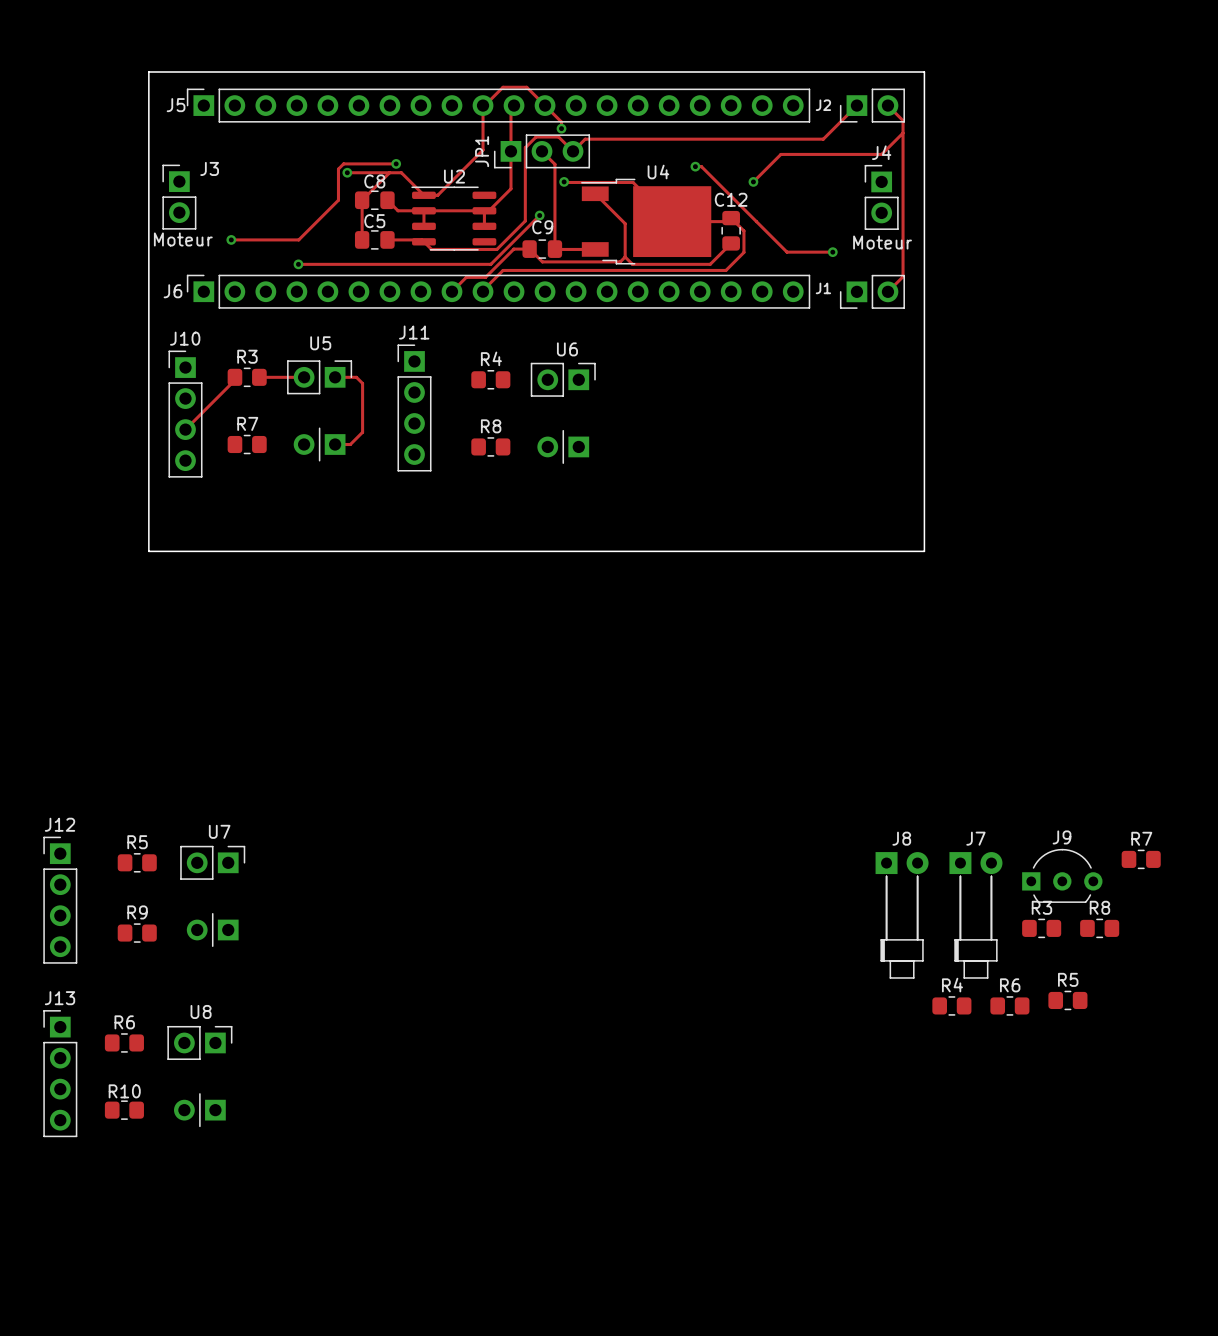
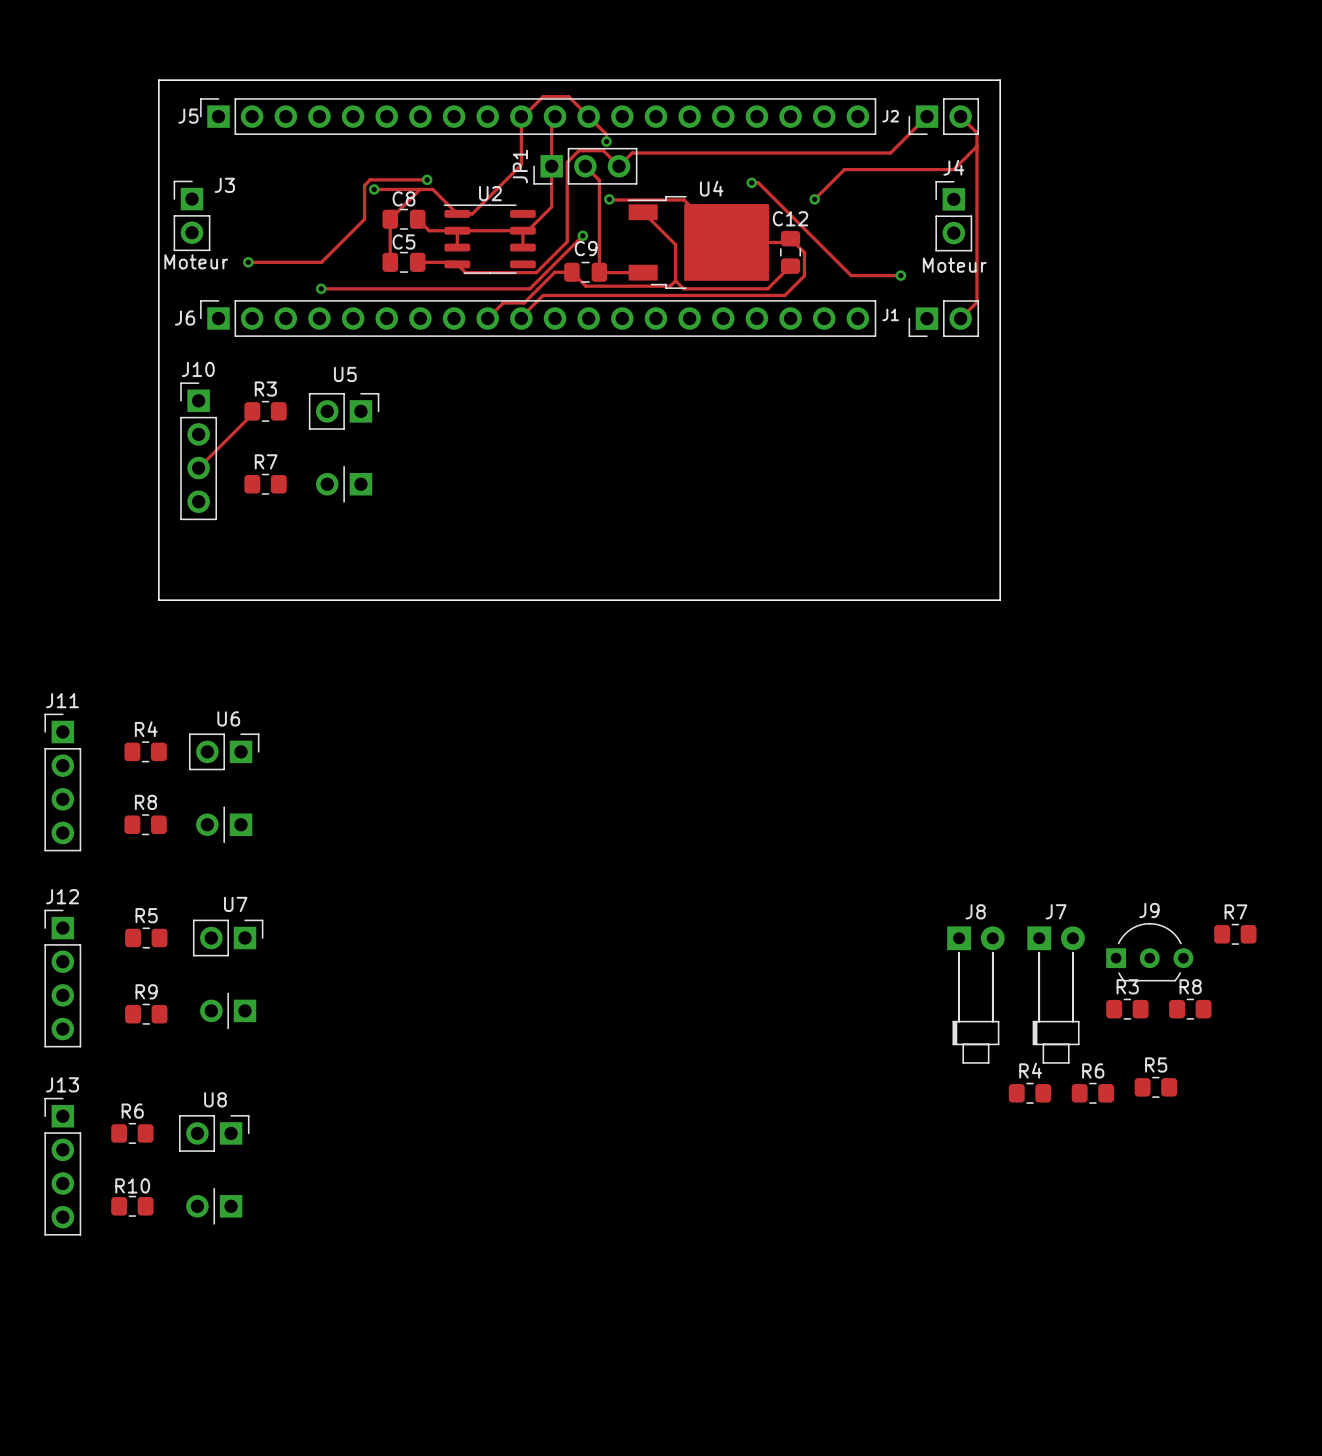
track: (259, 377) (304, 377) -> none
track: (335, 377) (356, 377) (362, 383) (362, 432) (350, 444) (335, 444) -> none
R4: (490, 379) -> none
J11 position: (414, 407) -> (62, 782)
U6 position: (563, 413) -> (224, 788)
R8: (490, 446) -> none
R4: none -> (145, 751)
R8: none -> (145, 824)

